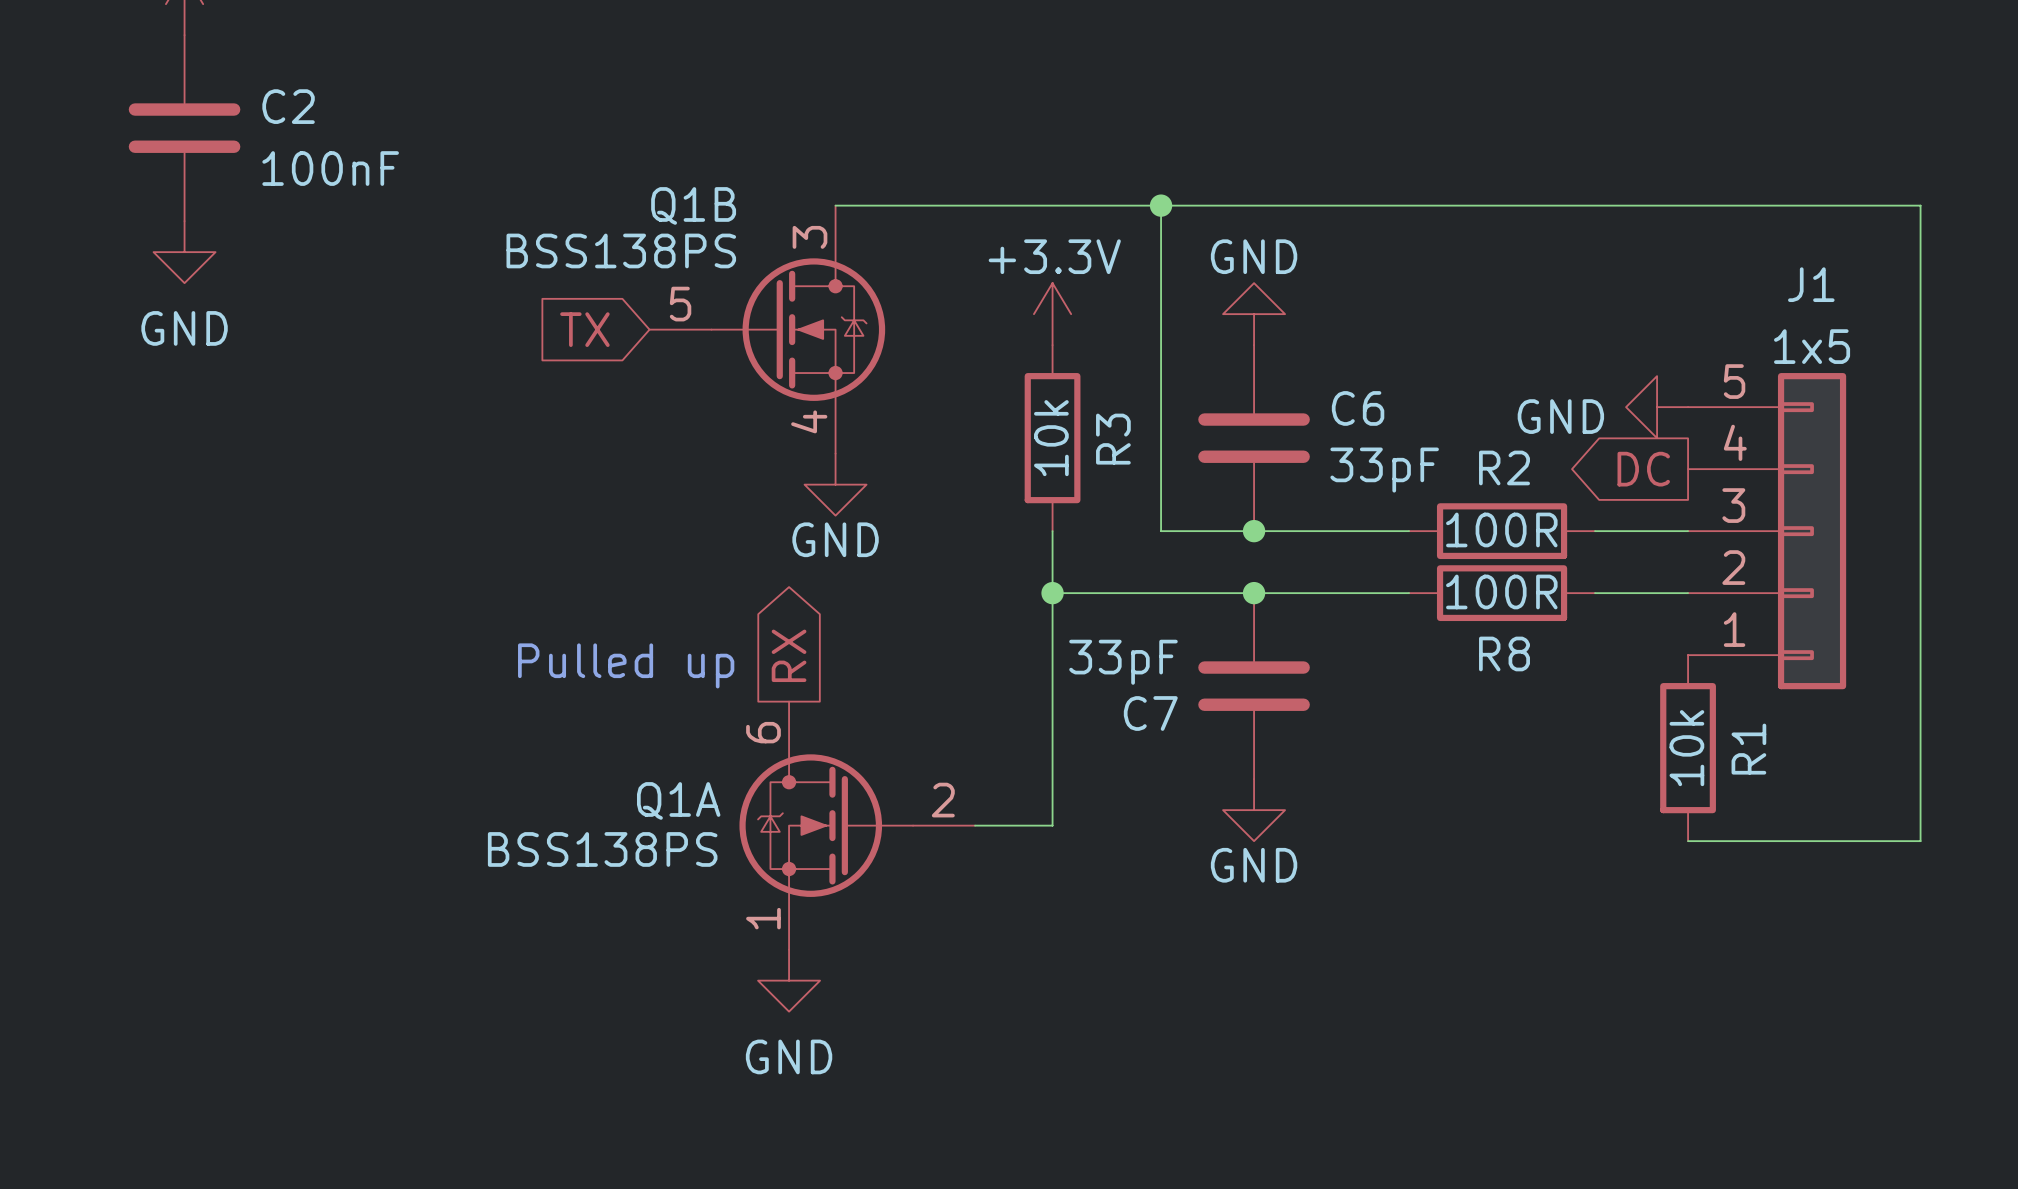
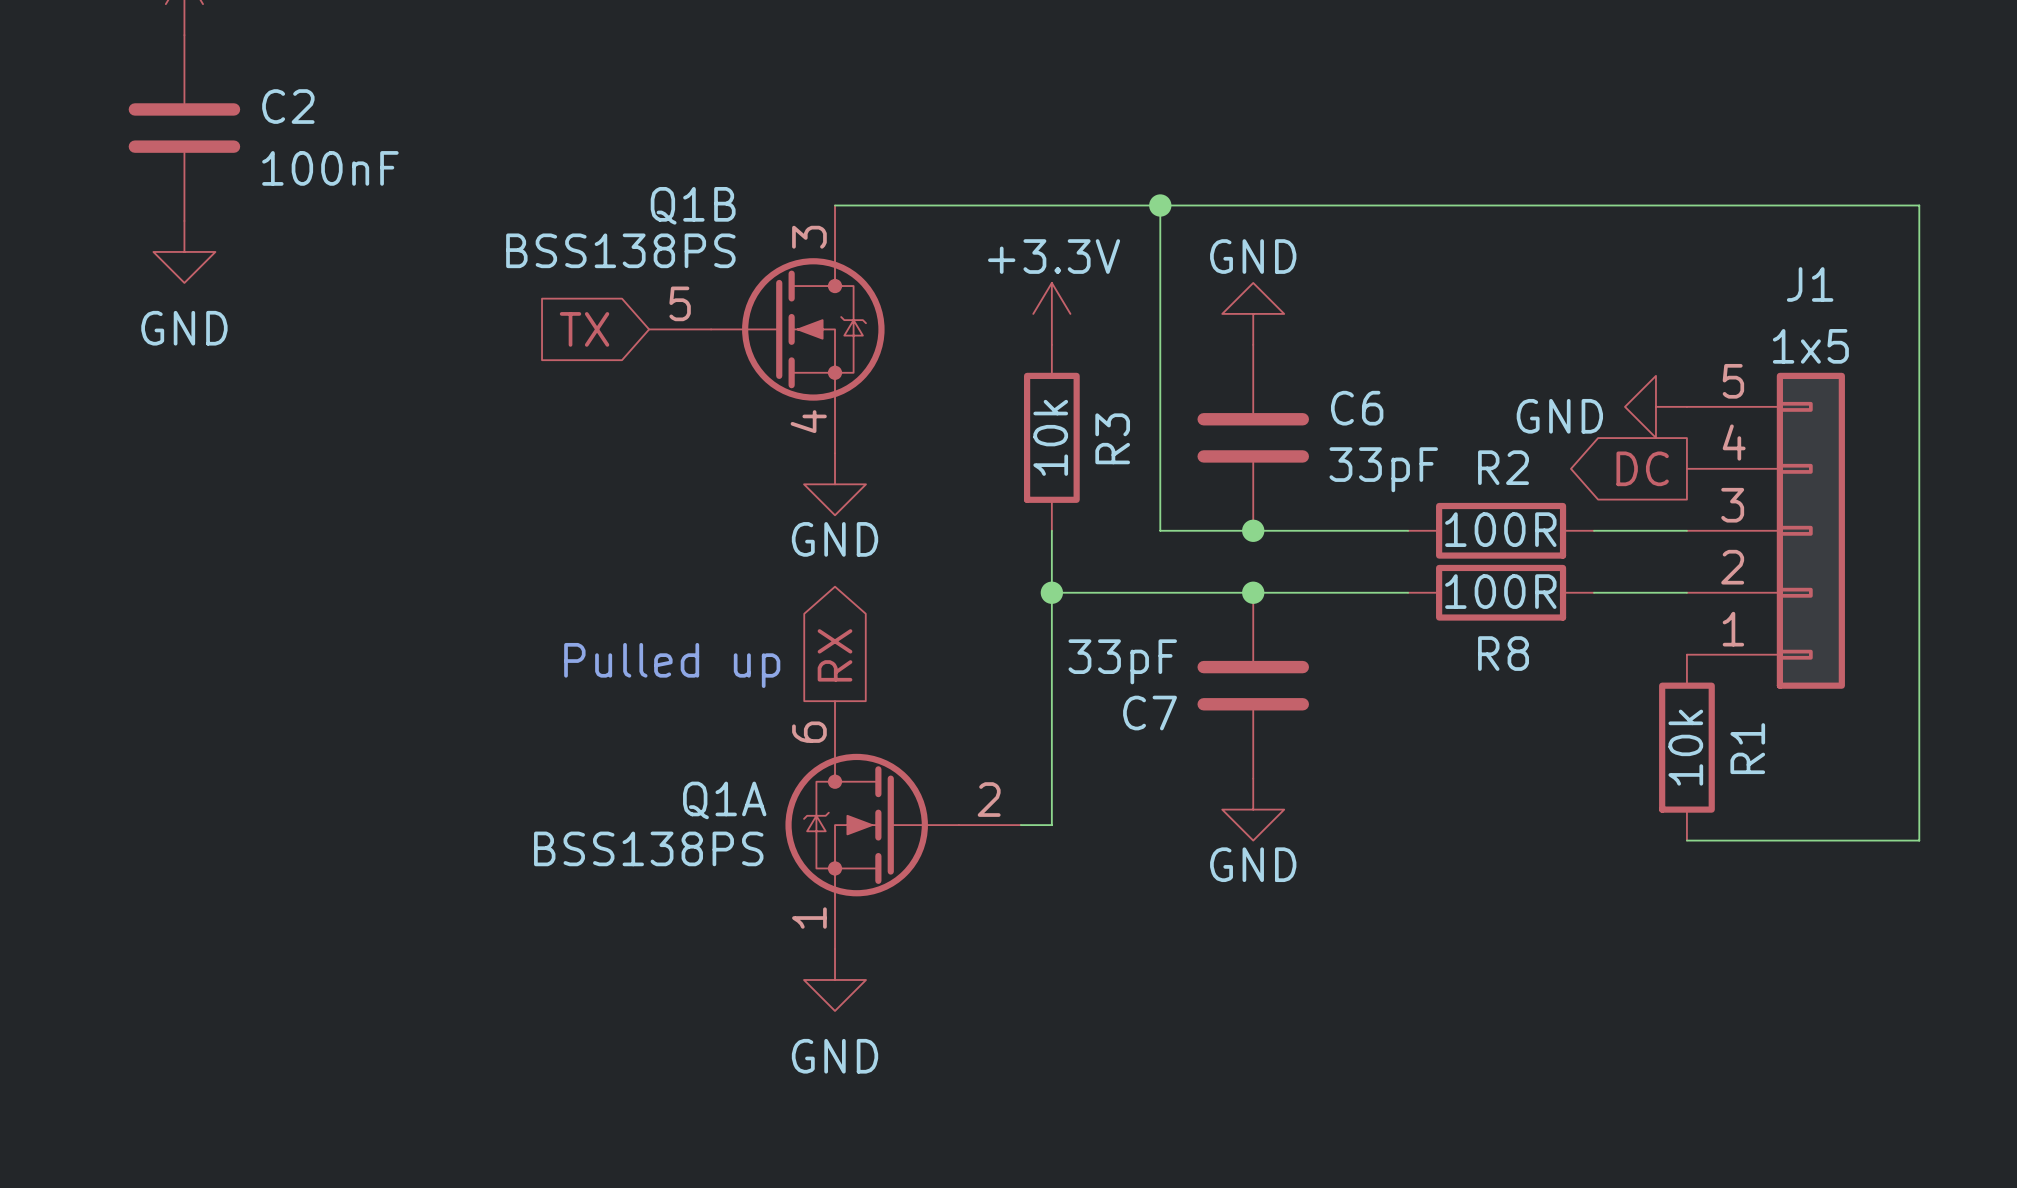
global label position: RX (789, 655) -> RX (835, 655)
text position: Pulled up (626, 665) -> Pulled up (672, 665)
Q1A position: (857, 825) -> (903, 825)
power symbol position: GND (789, 980) -> GND (835, 979)

